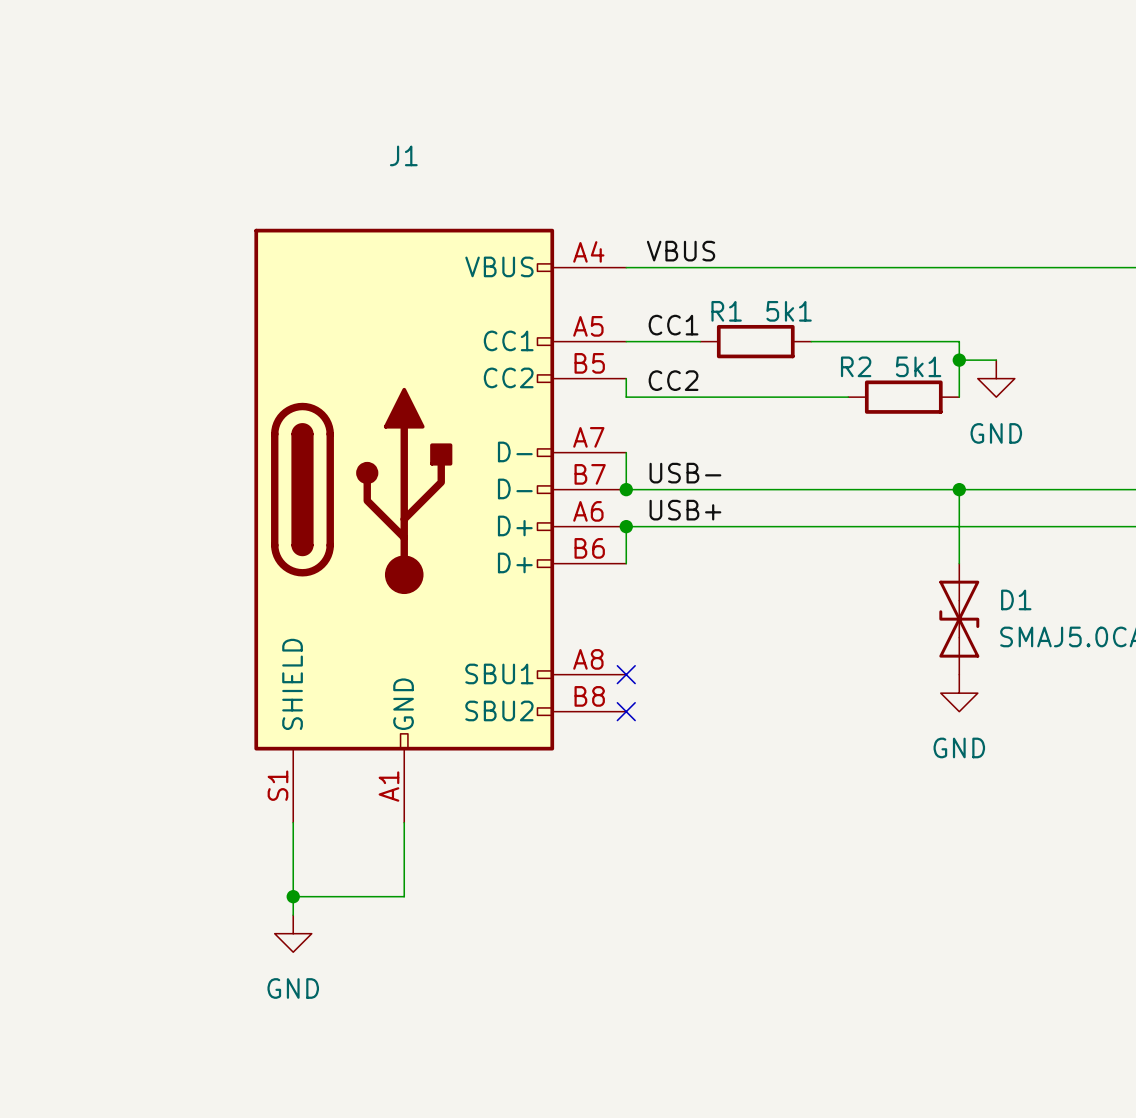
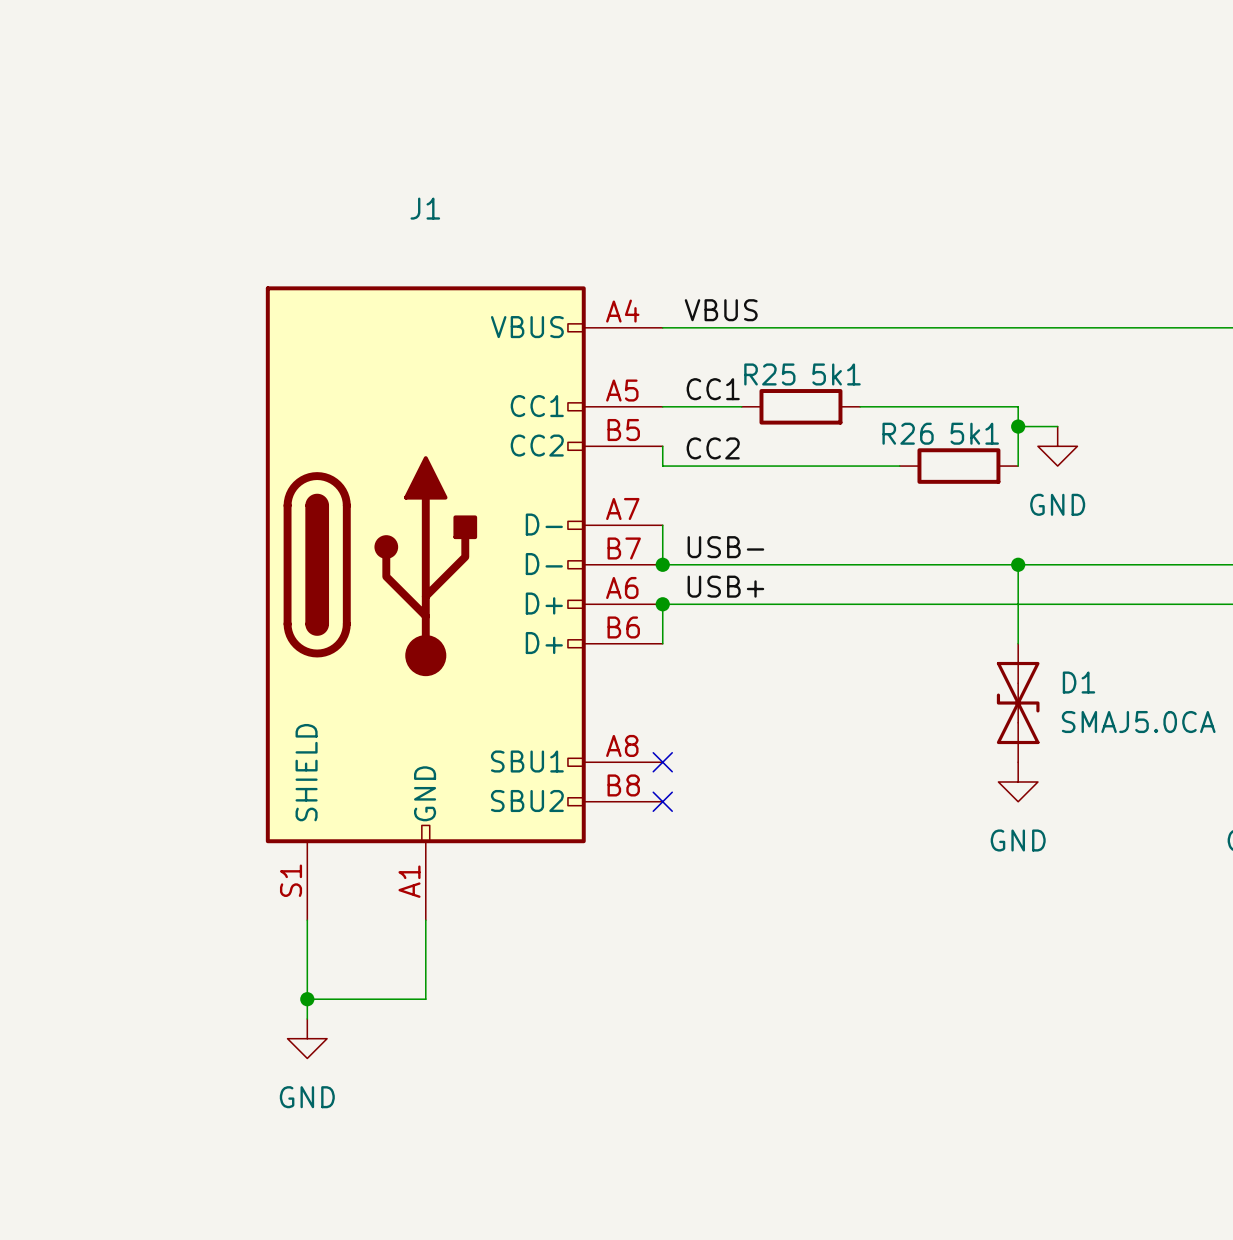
R1 name: R1 (726, 311) -> R25 (769, 374)
R2 name: R2 (856, 366) -> R26 (908, 433)

